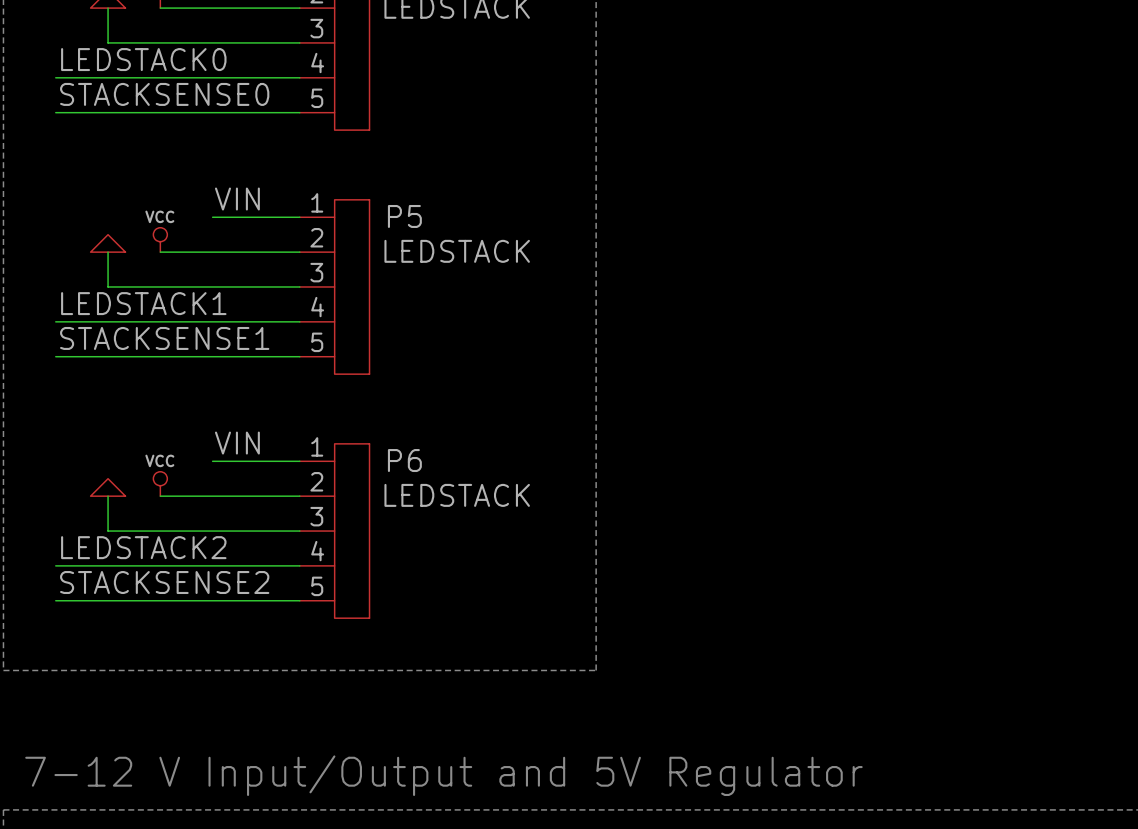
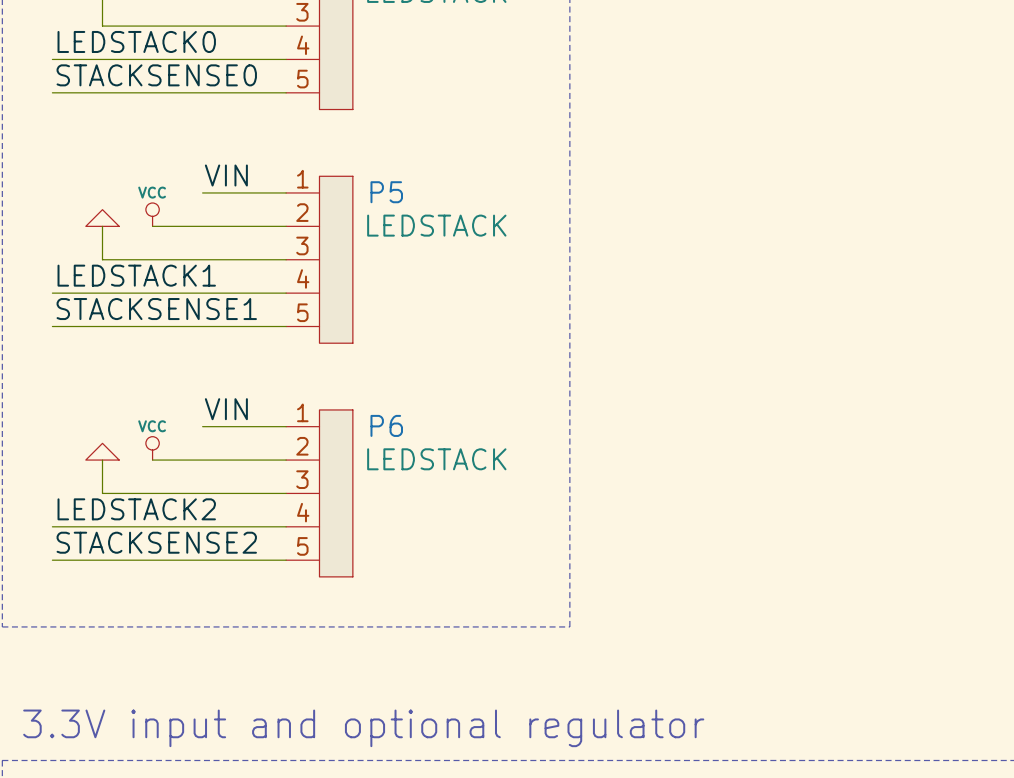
text: 7-12 V Input/Output and 5V Regulator (443, 775) -> 3.3V input and optional regulator (363, 728)

